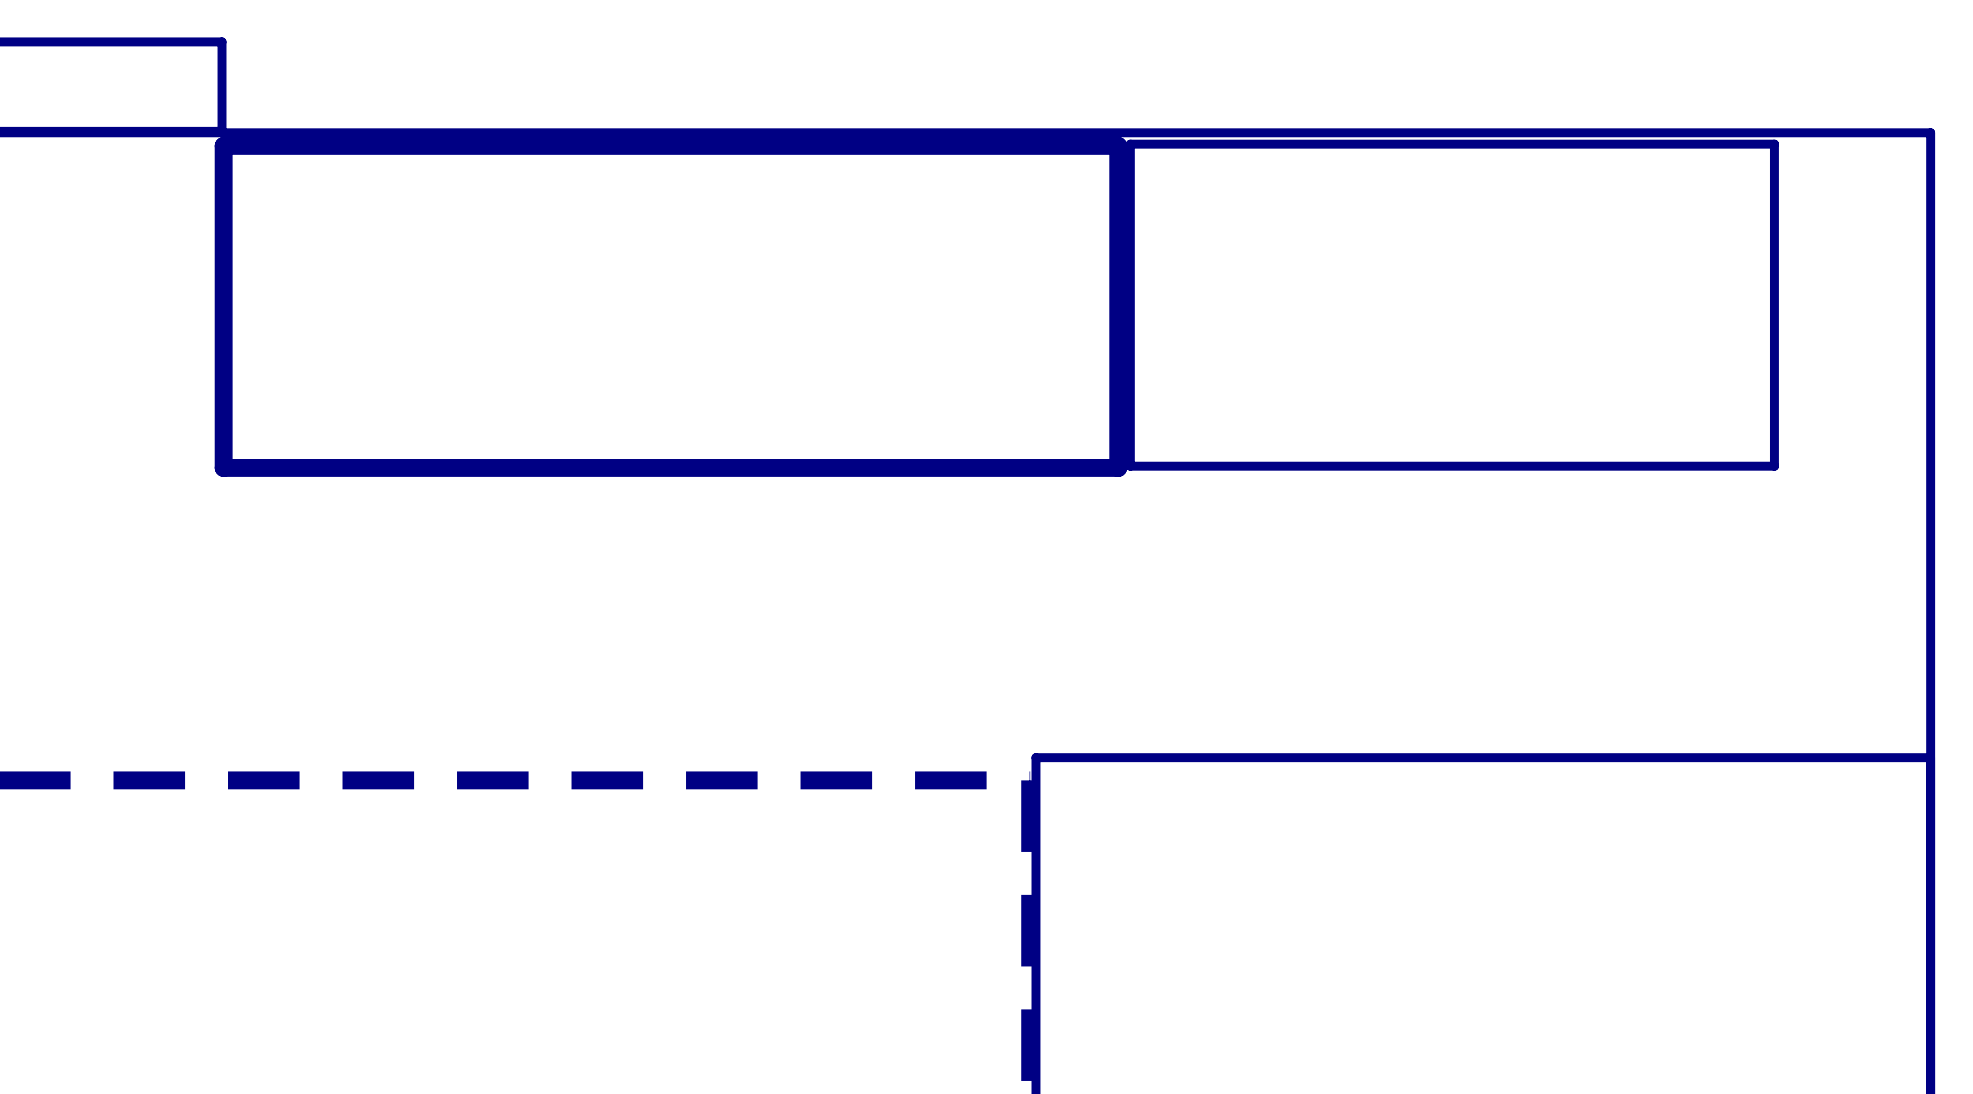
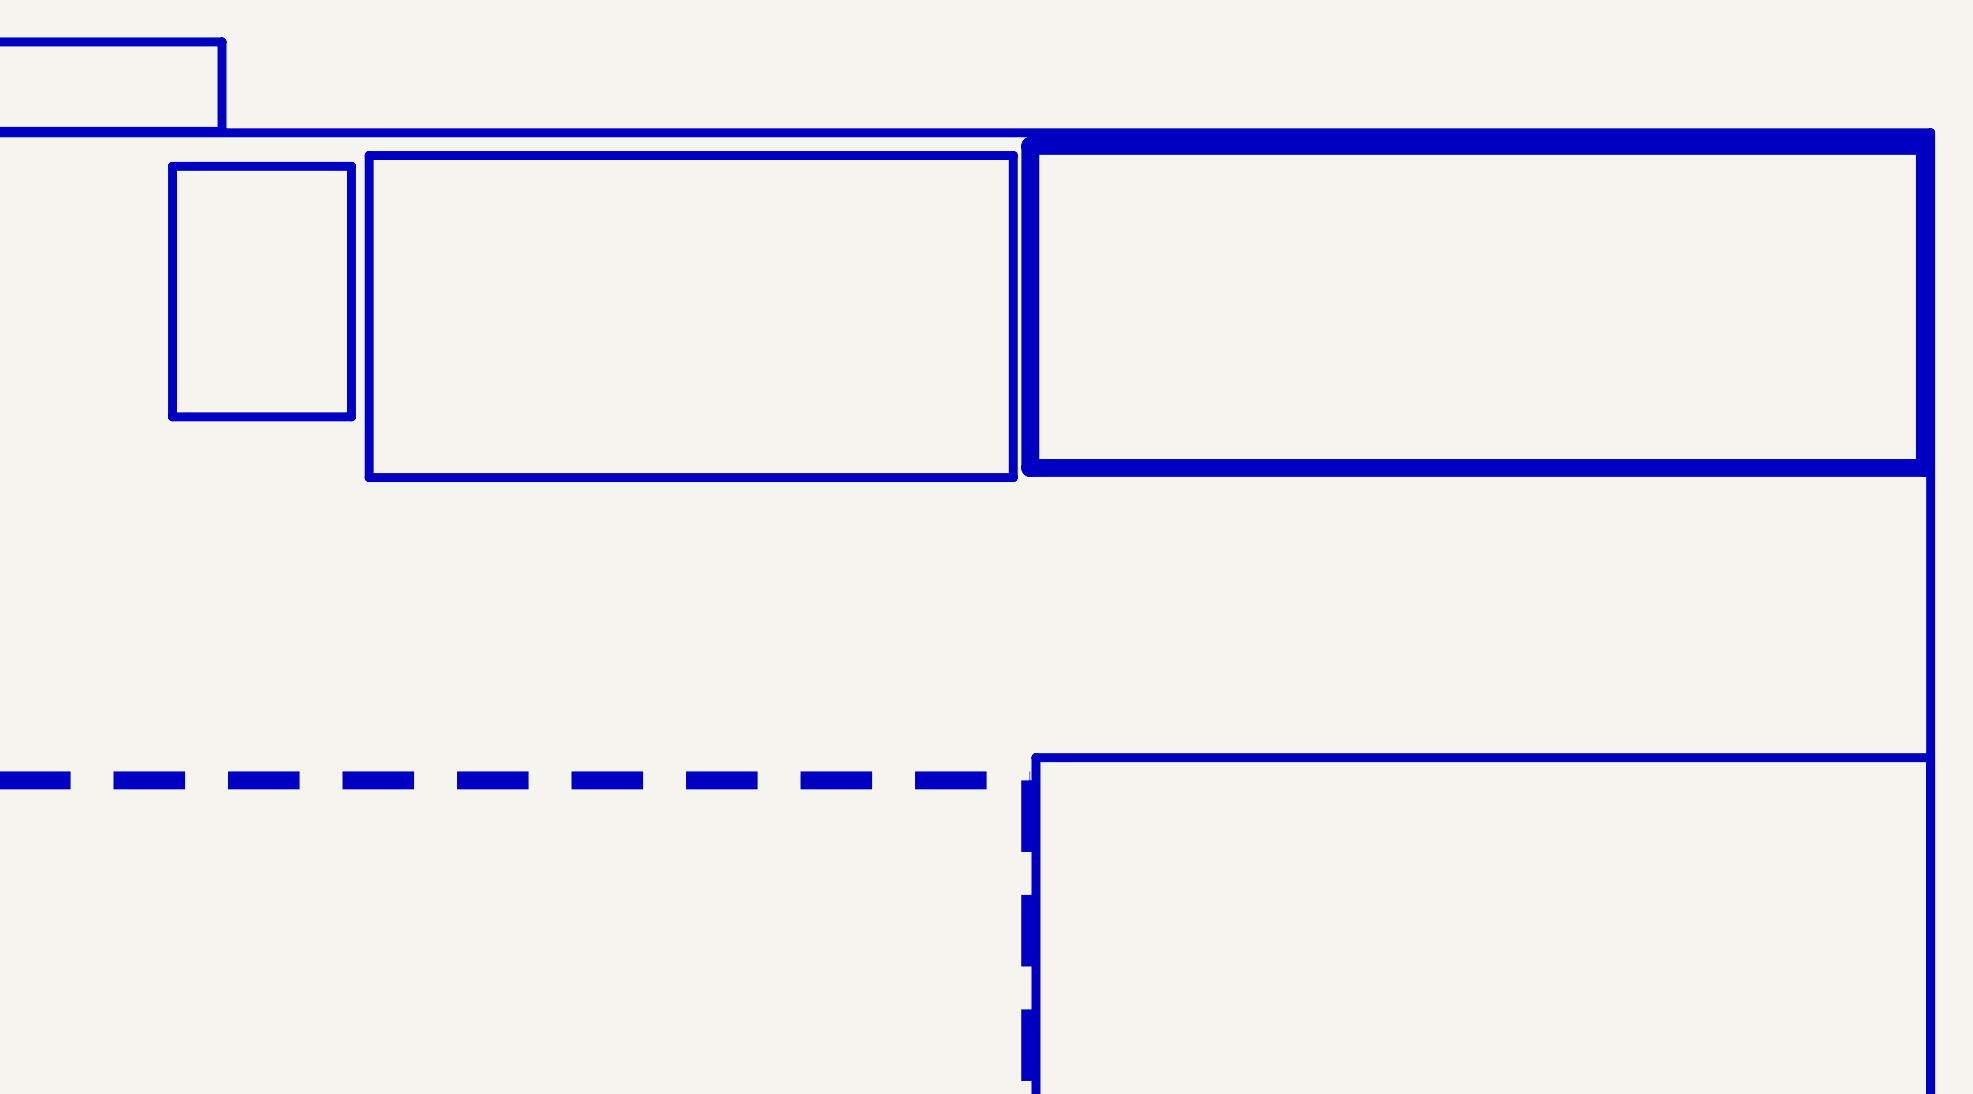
line: (1130, 144) (1774, 144) (1774, 466) (1130, 466) (1130, 144) -> none
line: (1030, 145) (223, 145) (223, 467) (1030, 467) -> (1030, 145) (1030, 467)
line: (1118, 145) (1118, 467) -> (1118, 145) (1924, 145) (1924, 467) (1118, 467)
line: none -> (369, 155) (1013, 155) (1013, 477) (369, 477) (369, 155)
line: none -> (172, 166) (351, 166) (351, 416) (172, 416) (172, 166)

